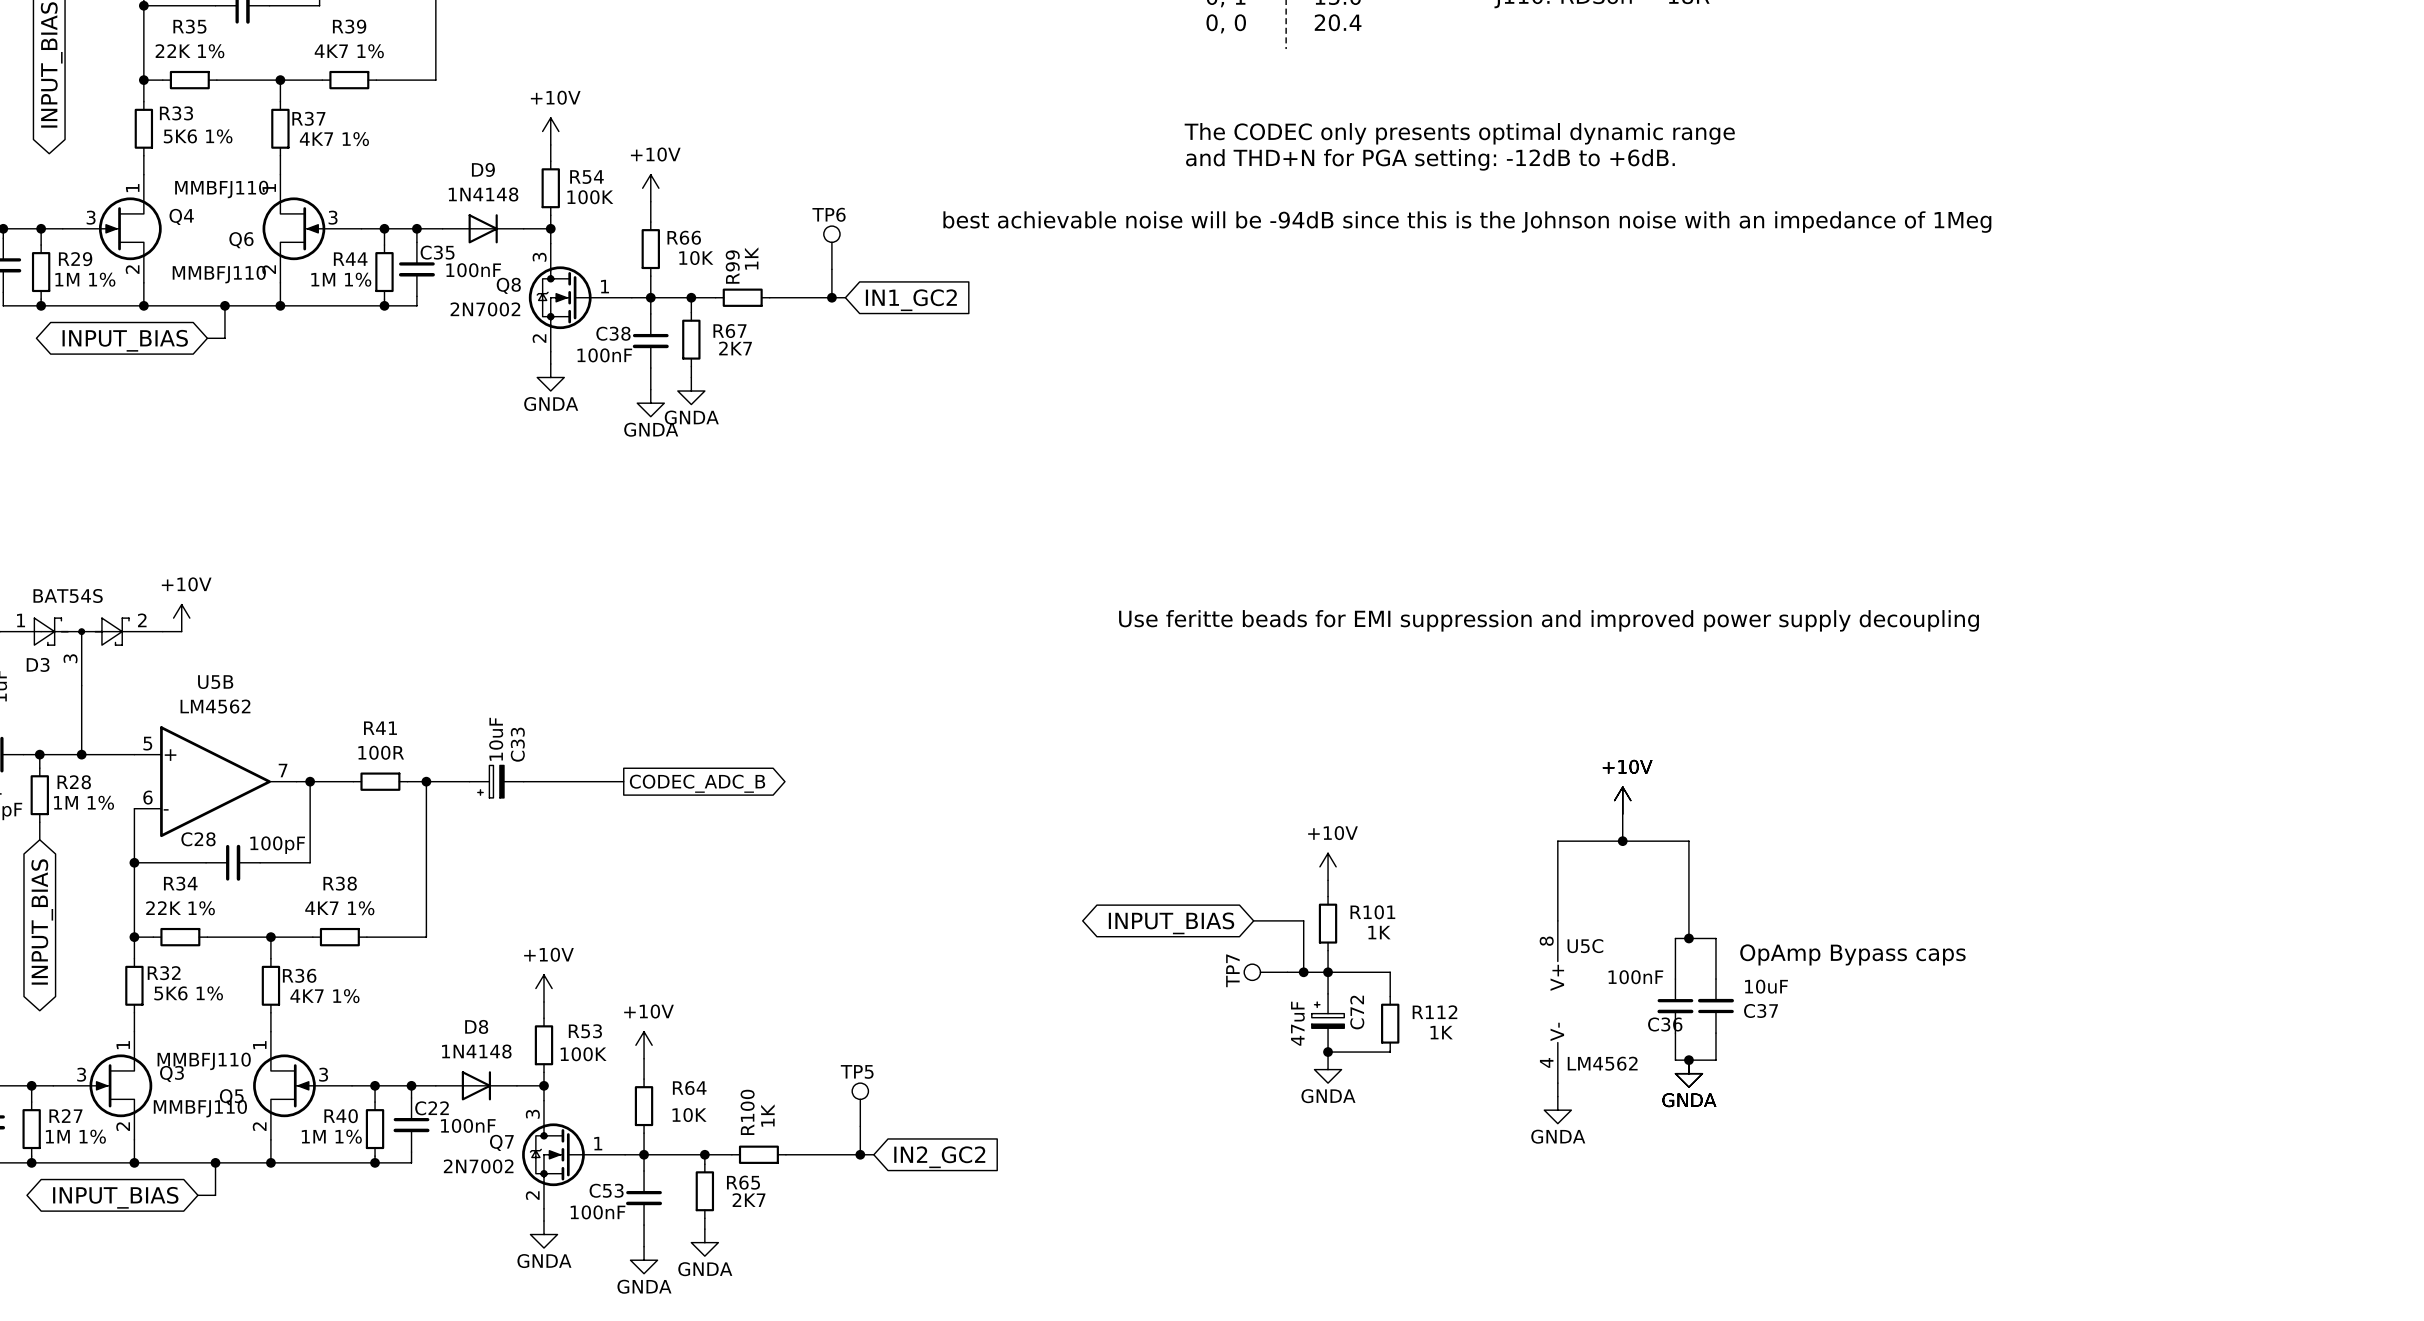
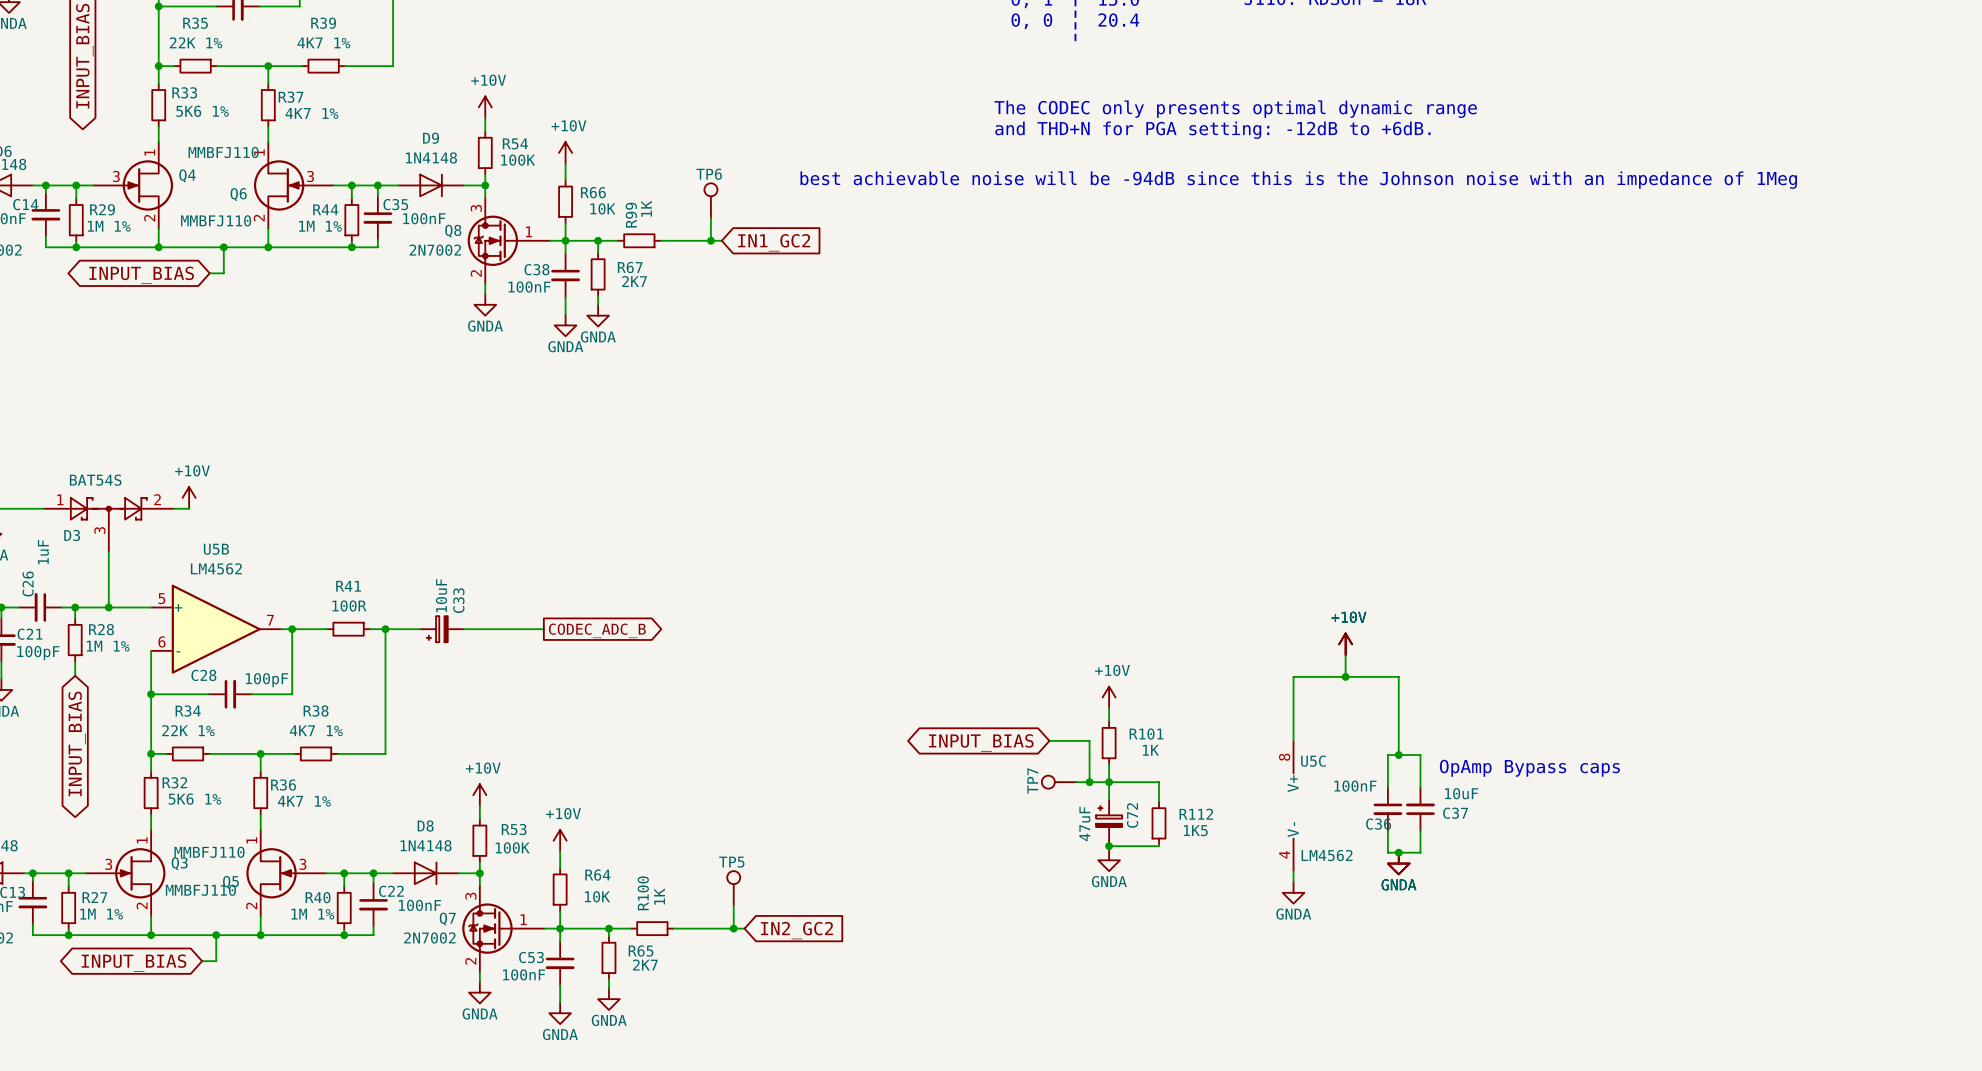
text: Use feritte beads for EMI suppression and improved power supply decoupling (1549, 620) -> none
R112 value: 1K (1441, 1032) -> 1K5 (1195, 830)

